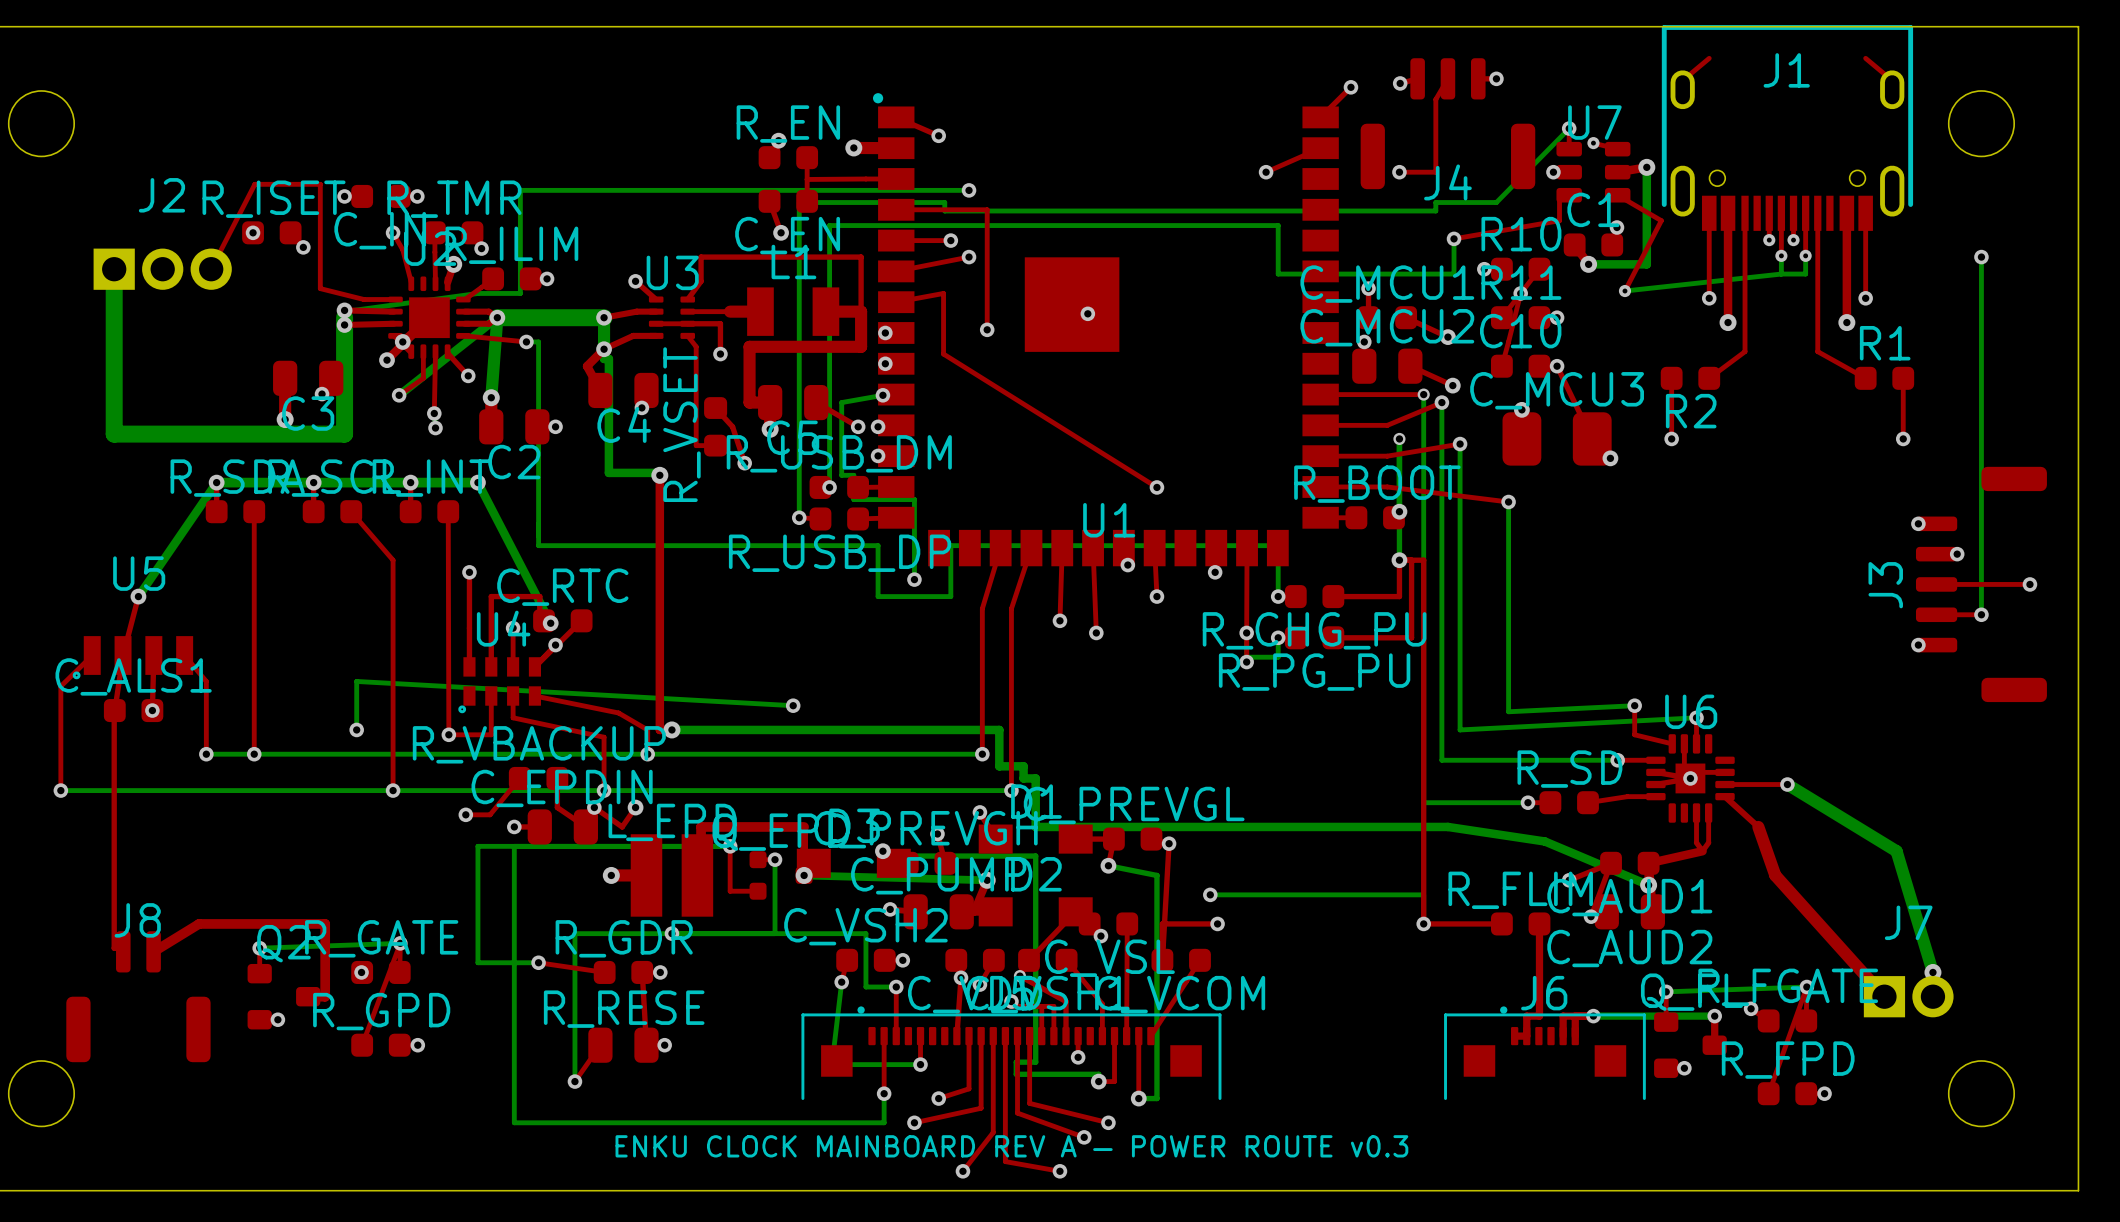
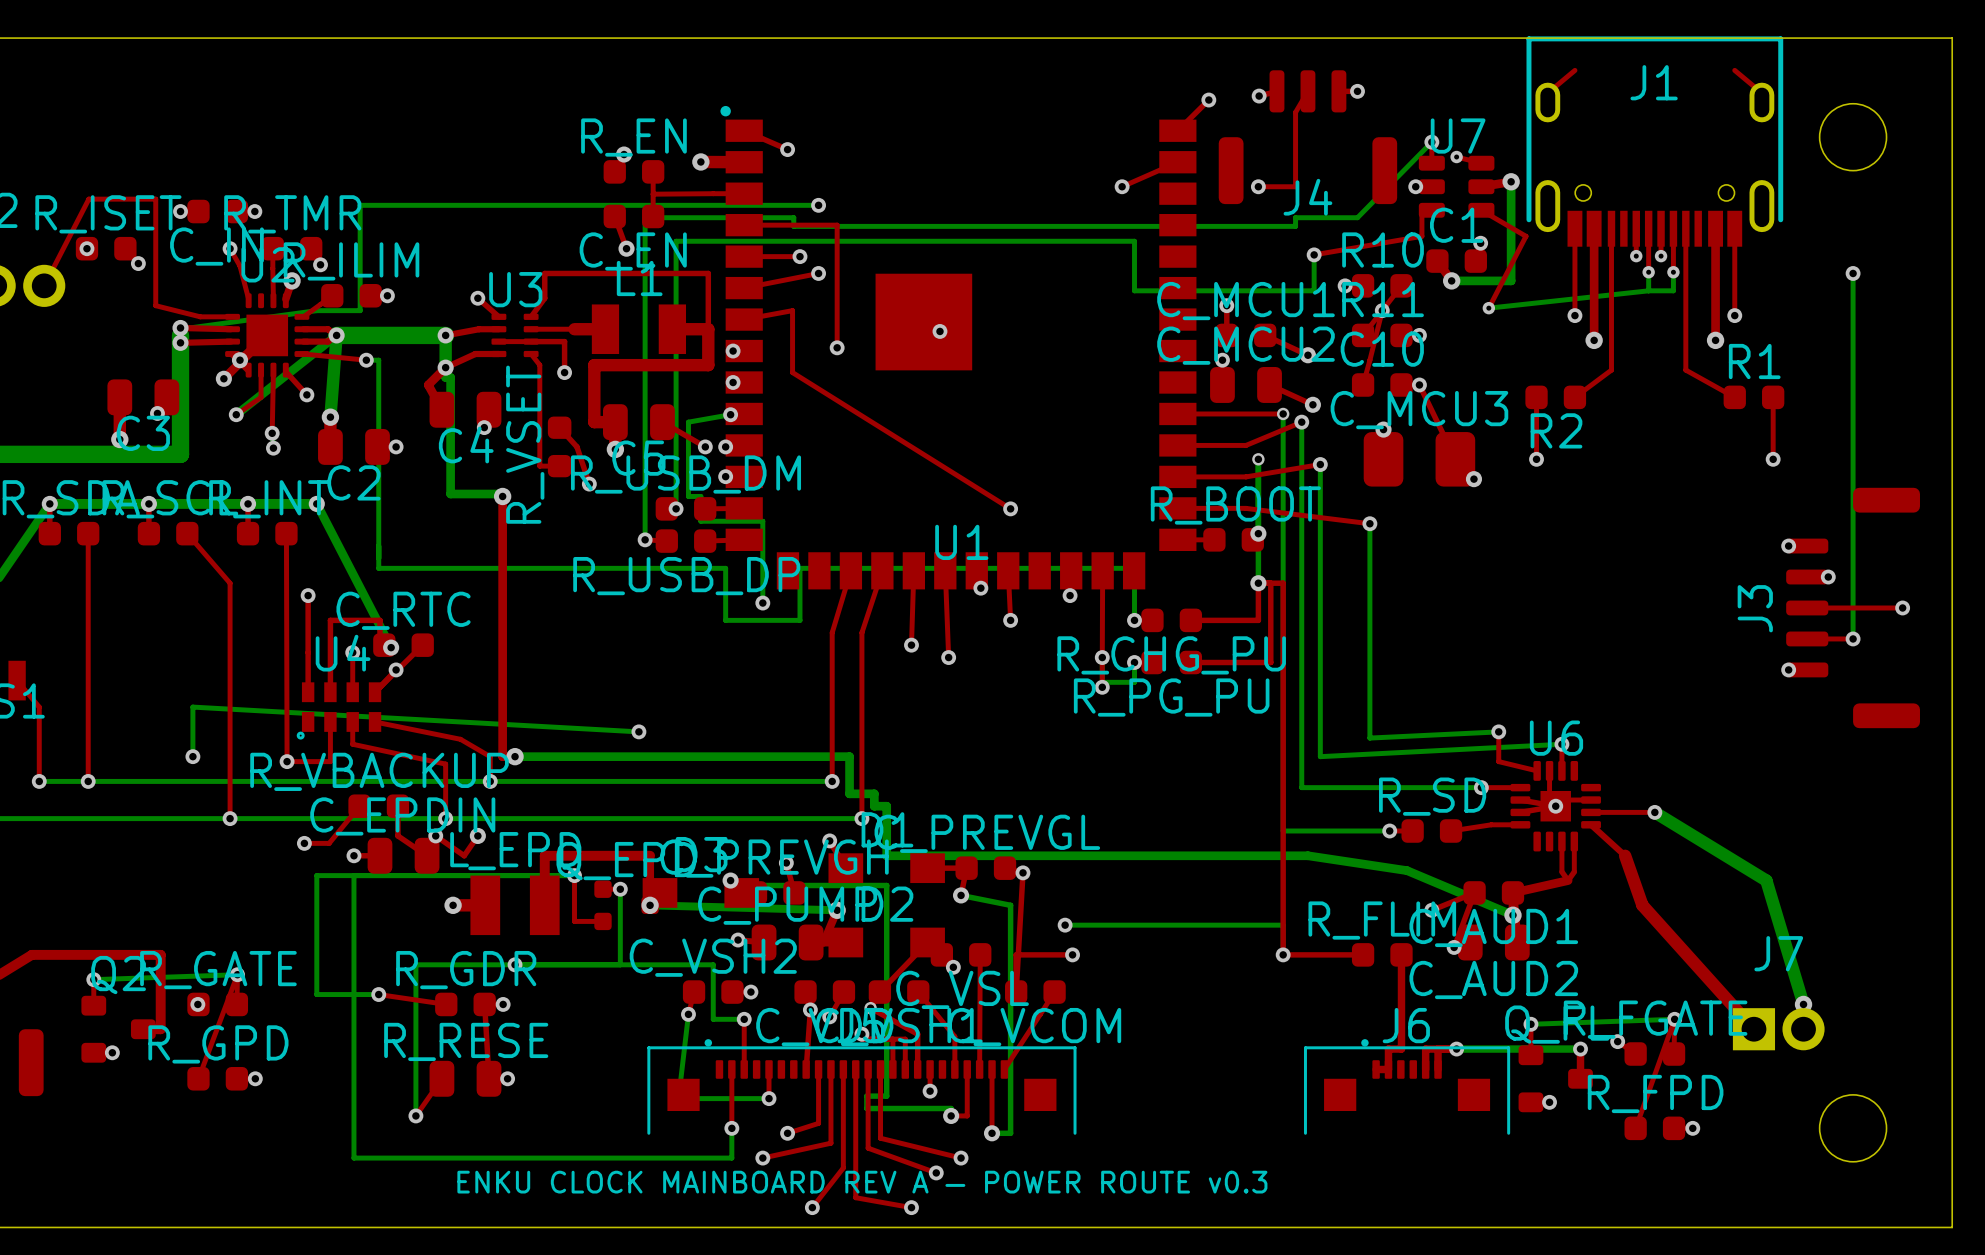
L_EPD footprint: [630, 834, 714, 917] -> [470, 875, 560, 936]

